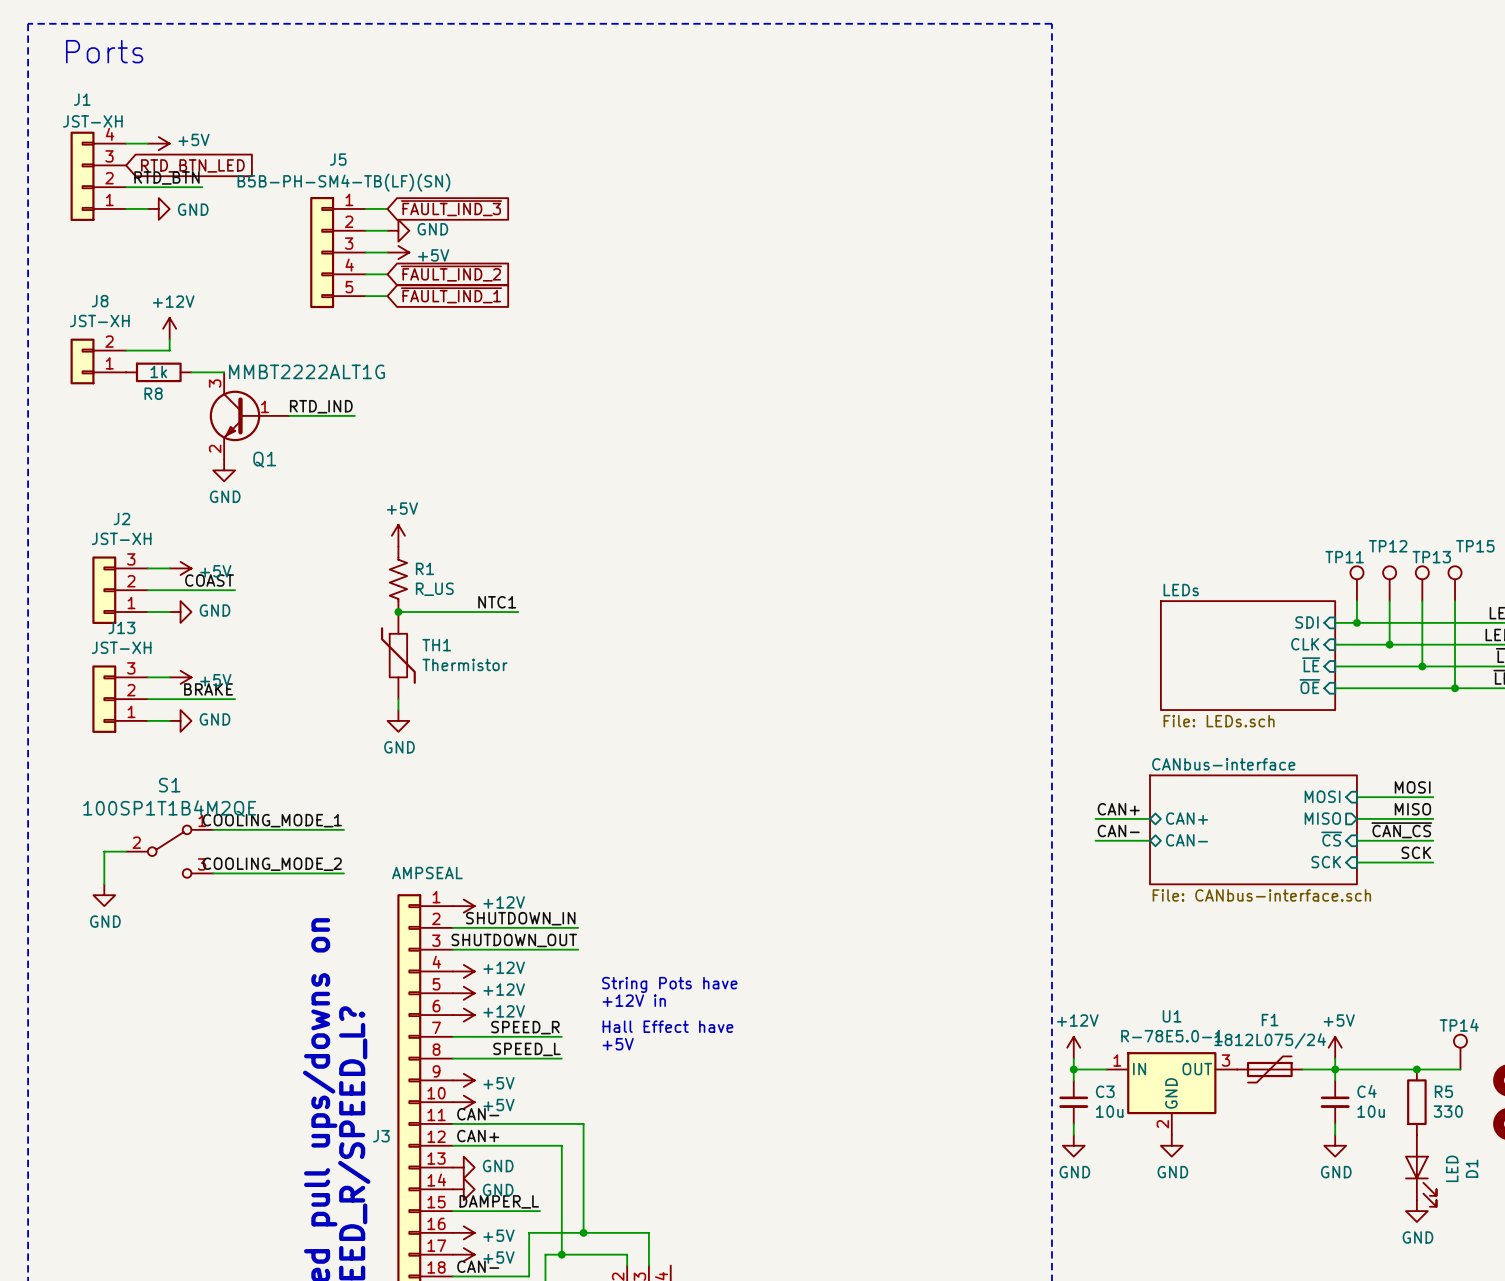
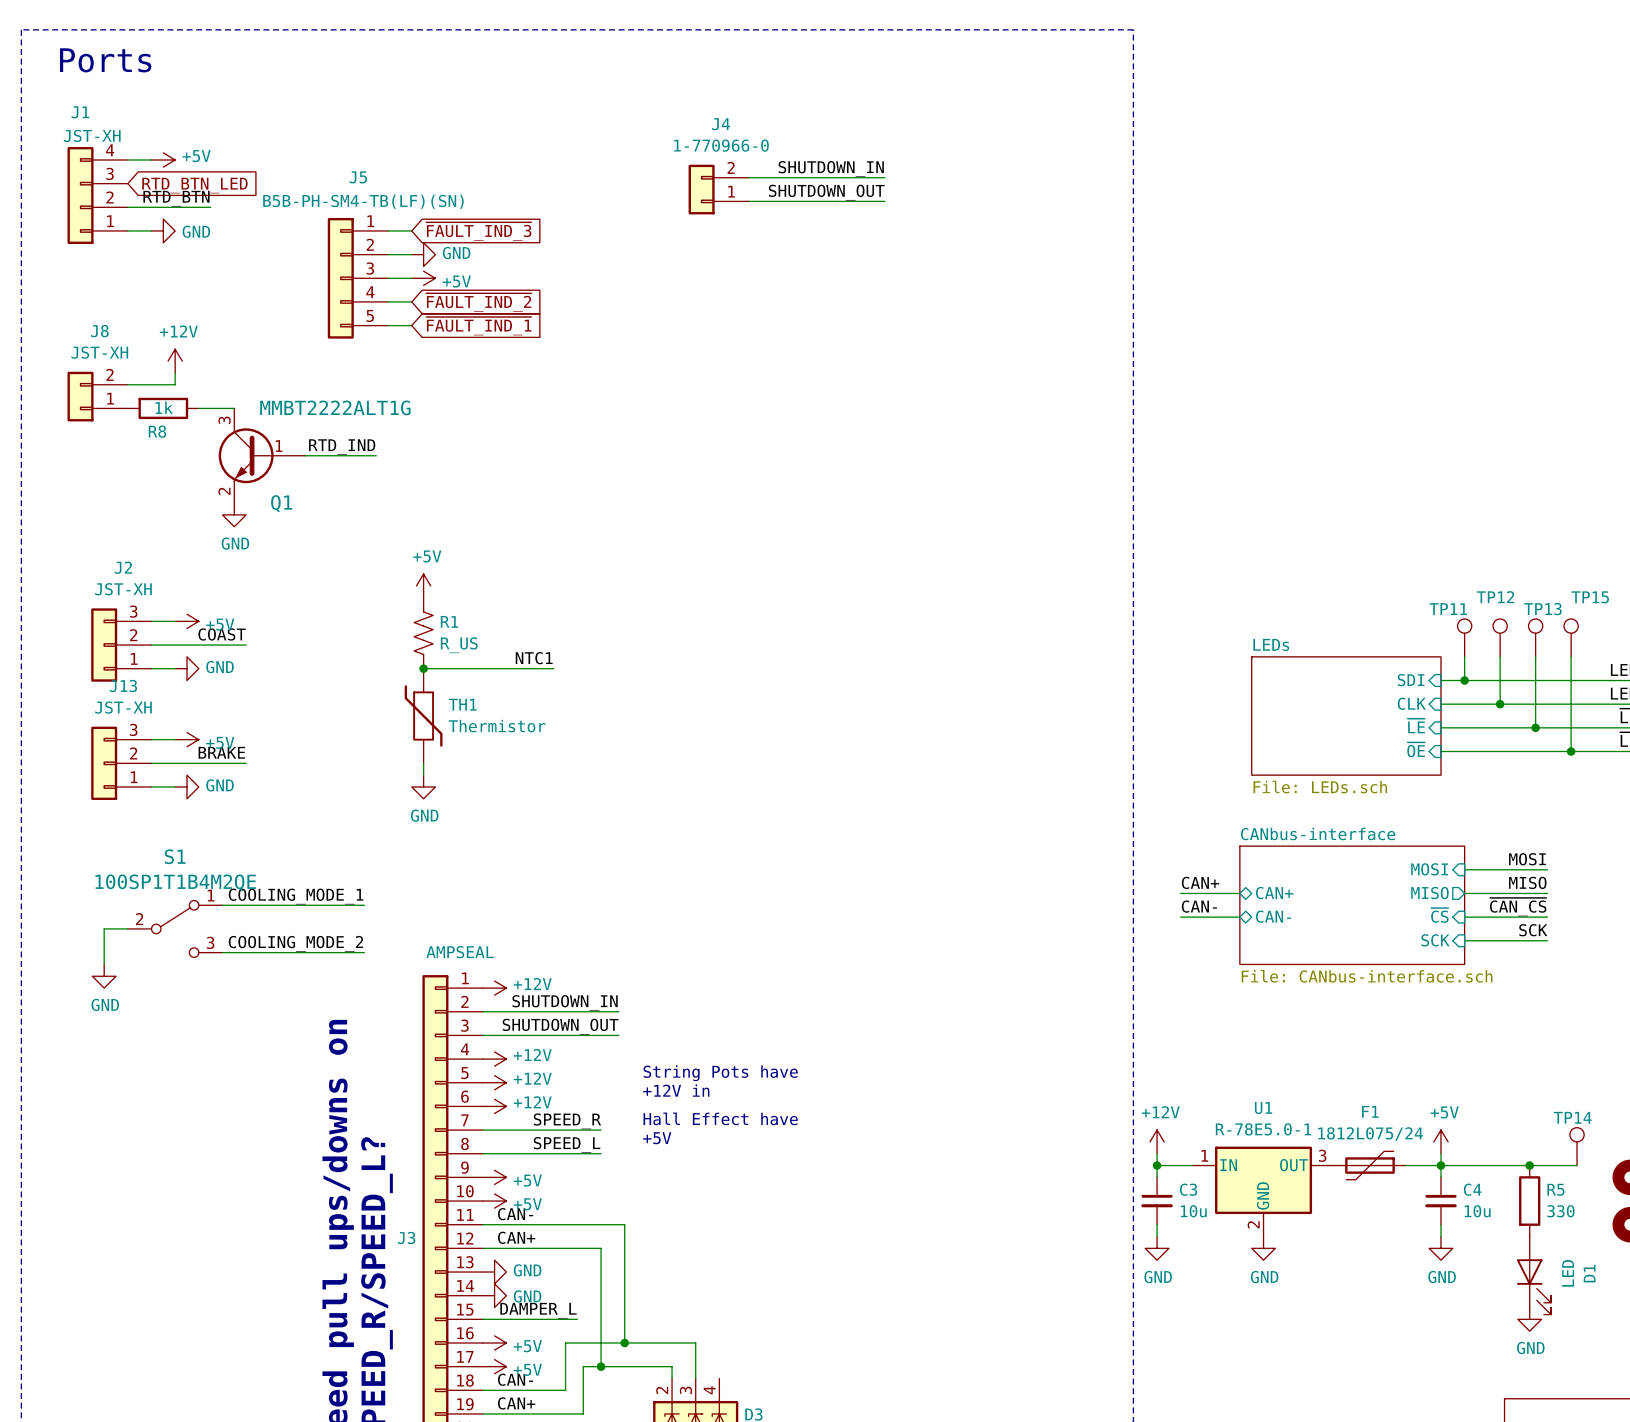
label: none -> SHUTDOWN_IN (831, 168)
wire: none -> (748, 177) (884, 177)
J4: none -> 1-770966-0 (718, 189)
label: none -> SHUTDOWN_OUT (826, 192)
wire: none -> (748, 201) (884, 201)

